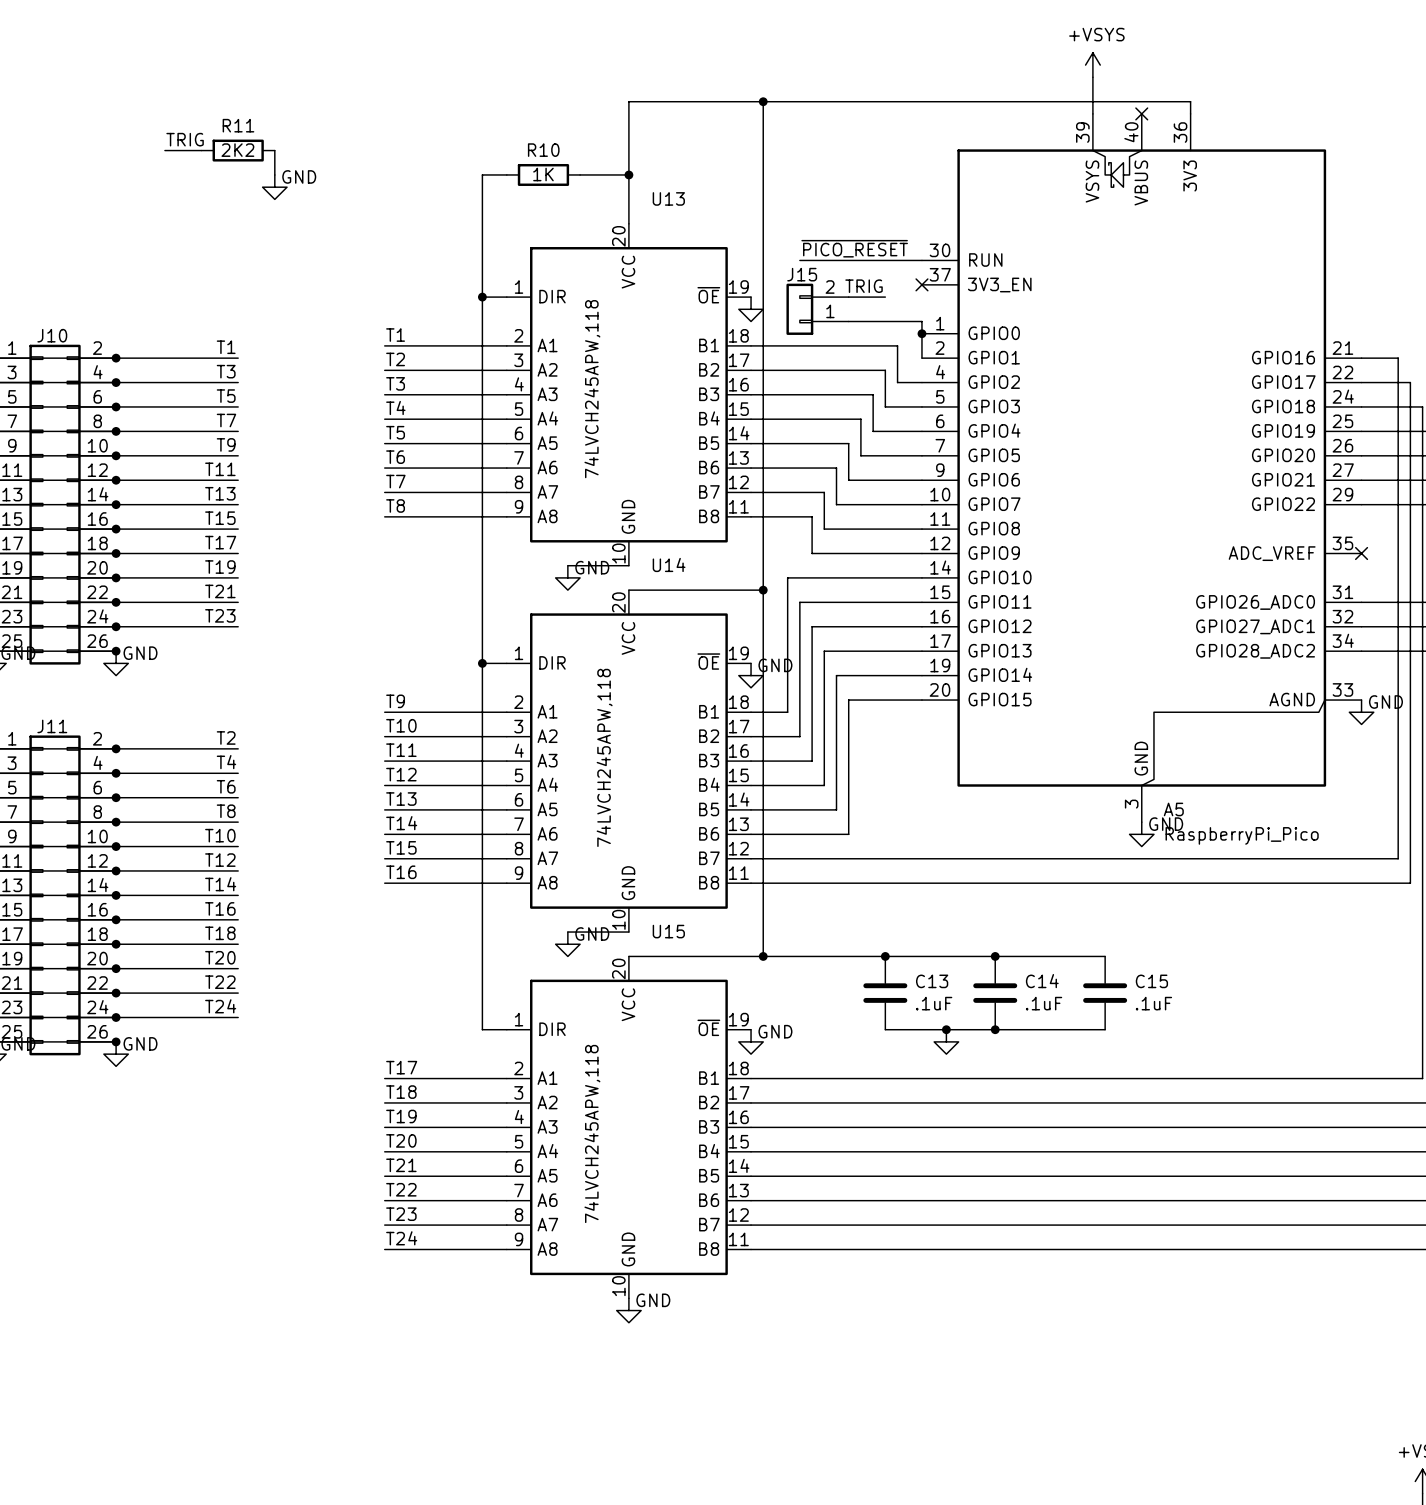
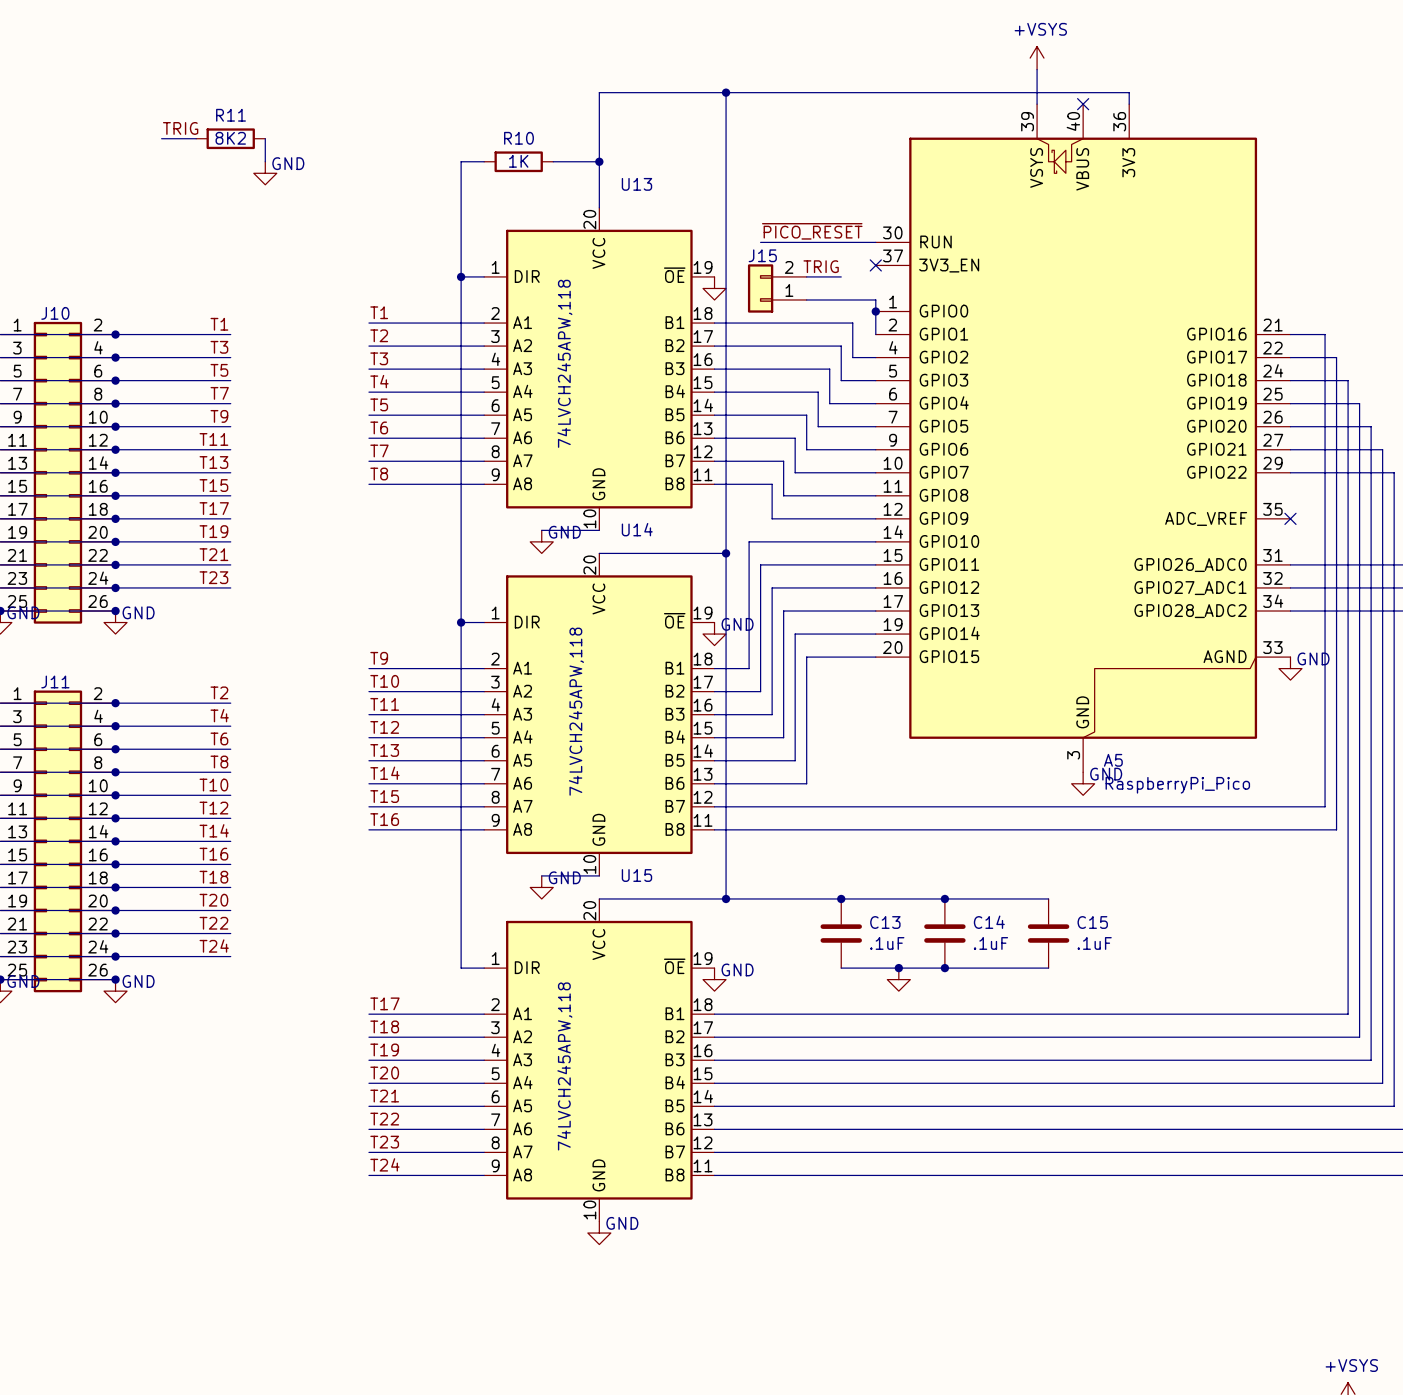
R11 value: 2K2 (237, 150) -> 8K2 (230, 138)

